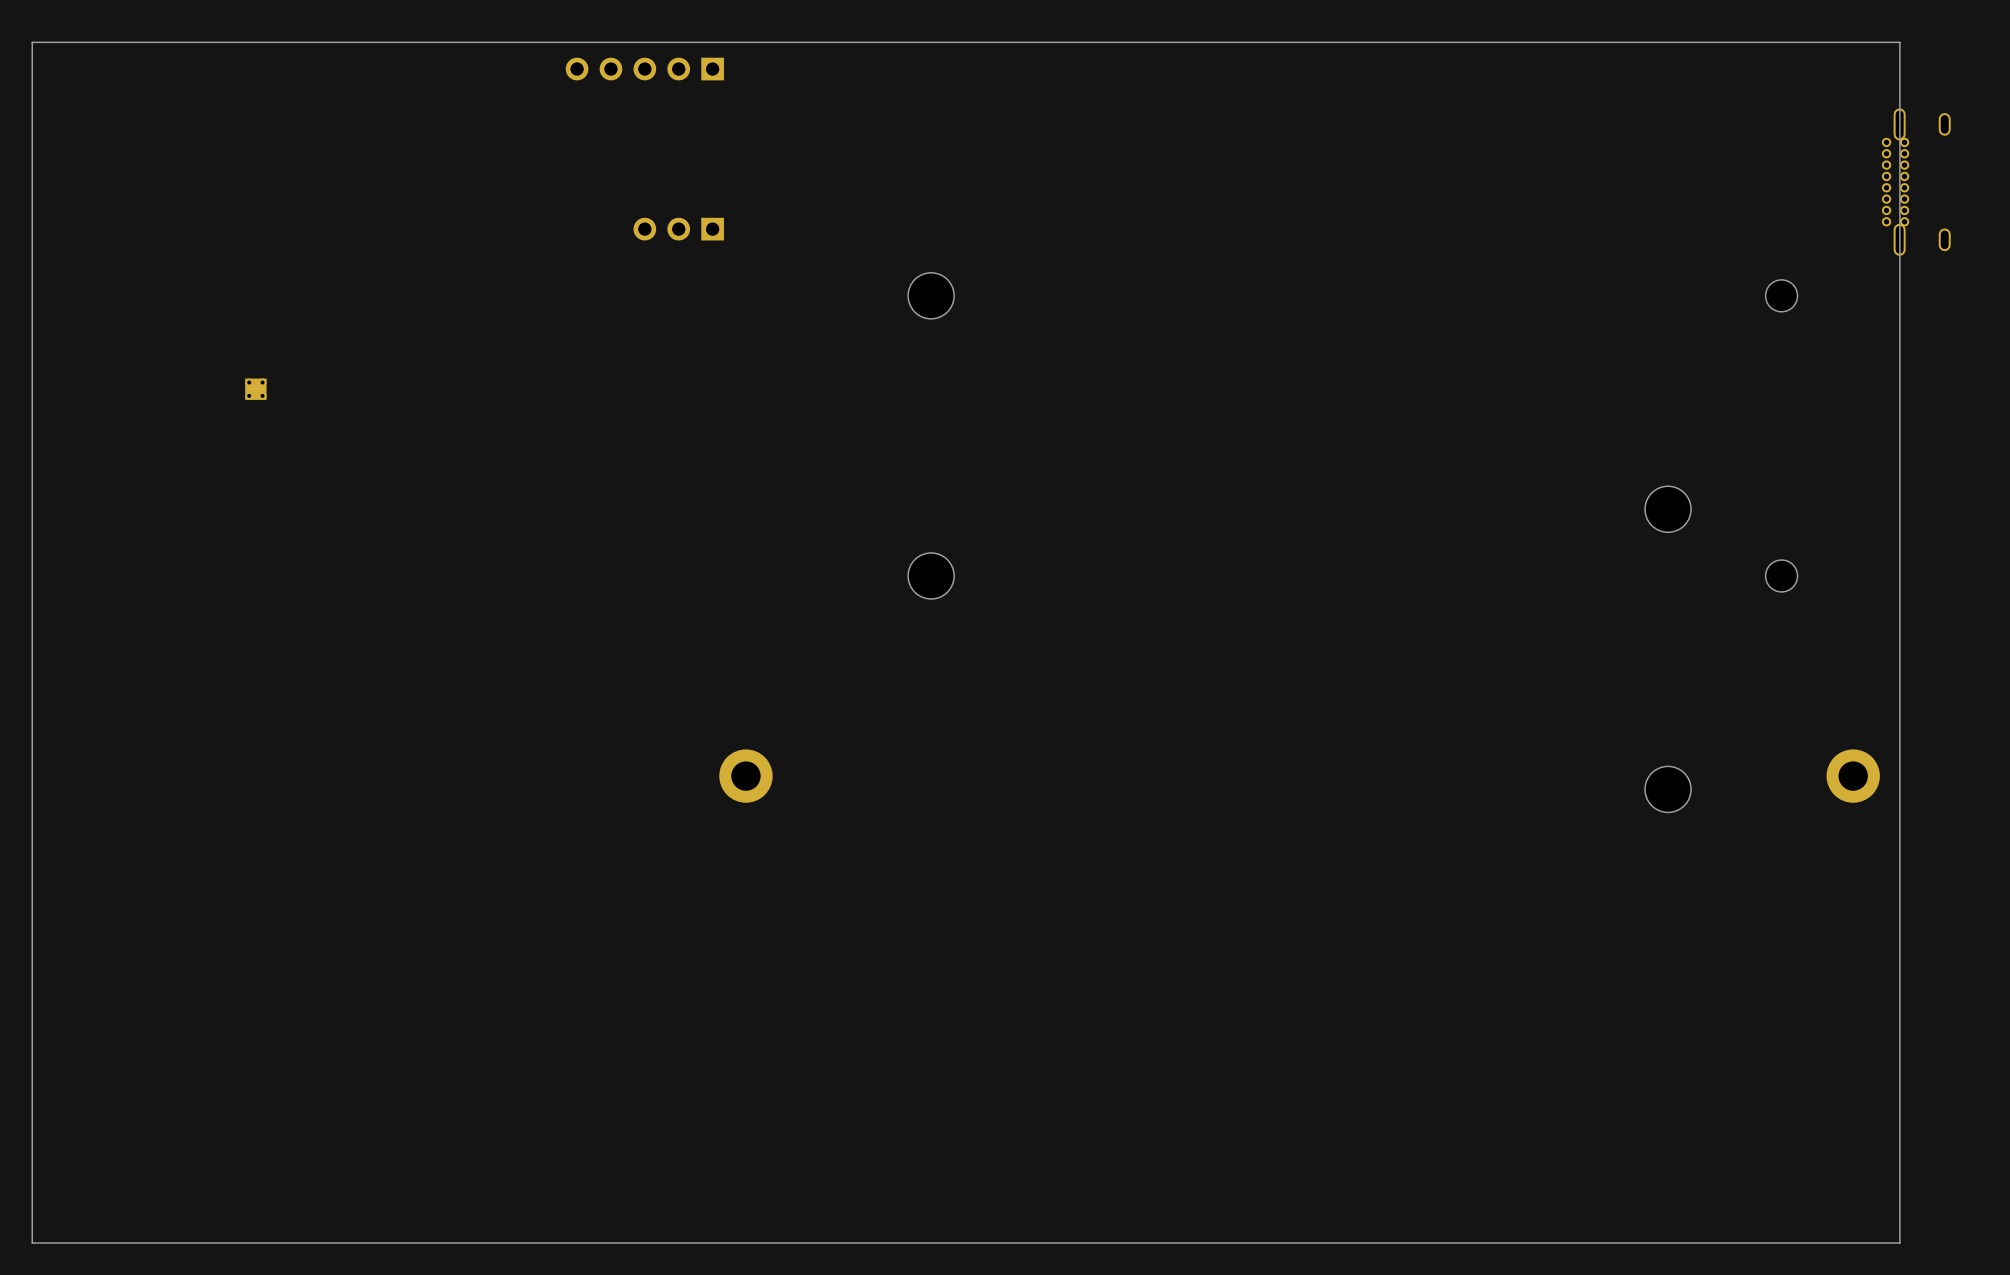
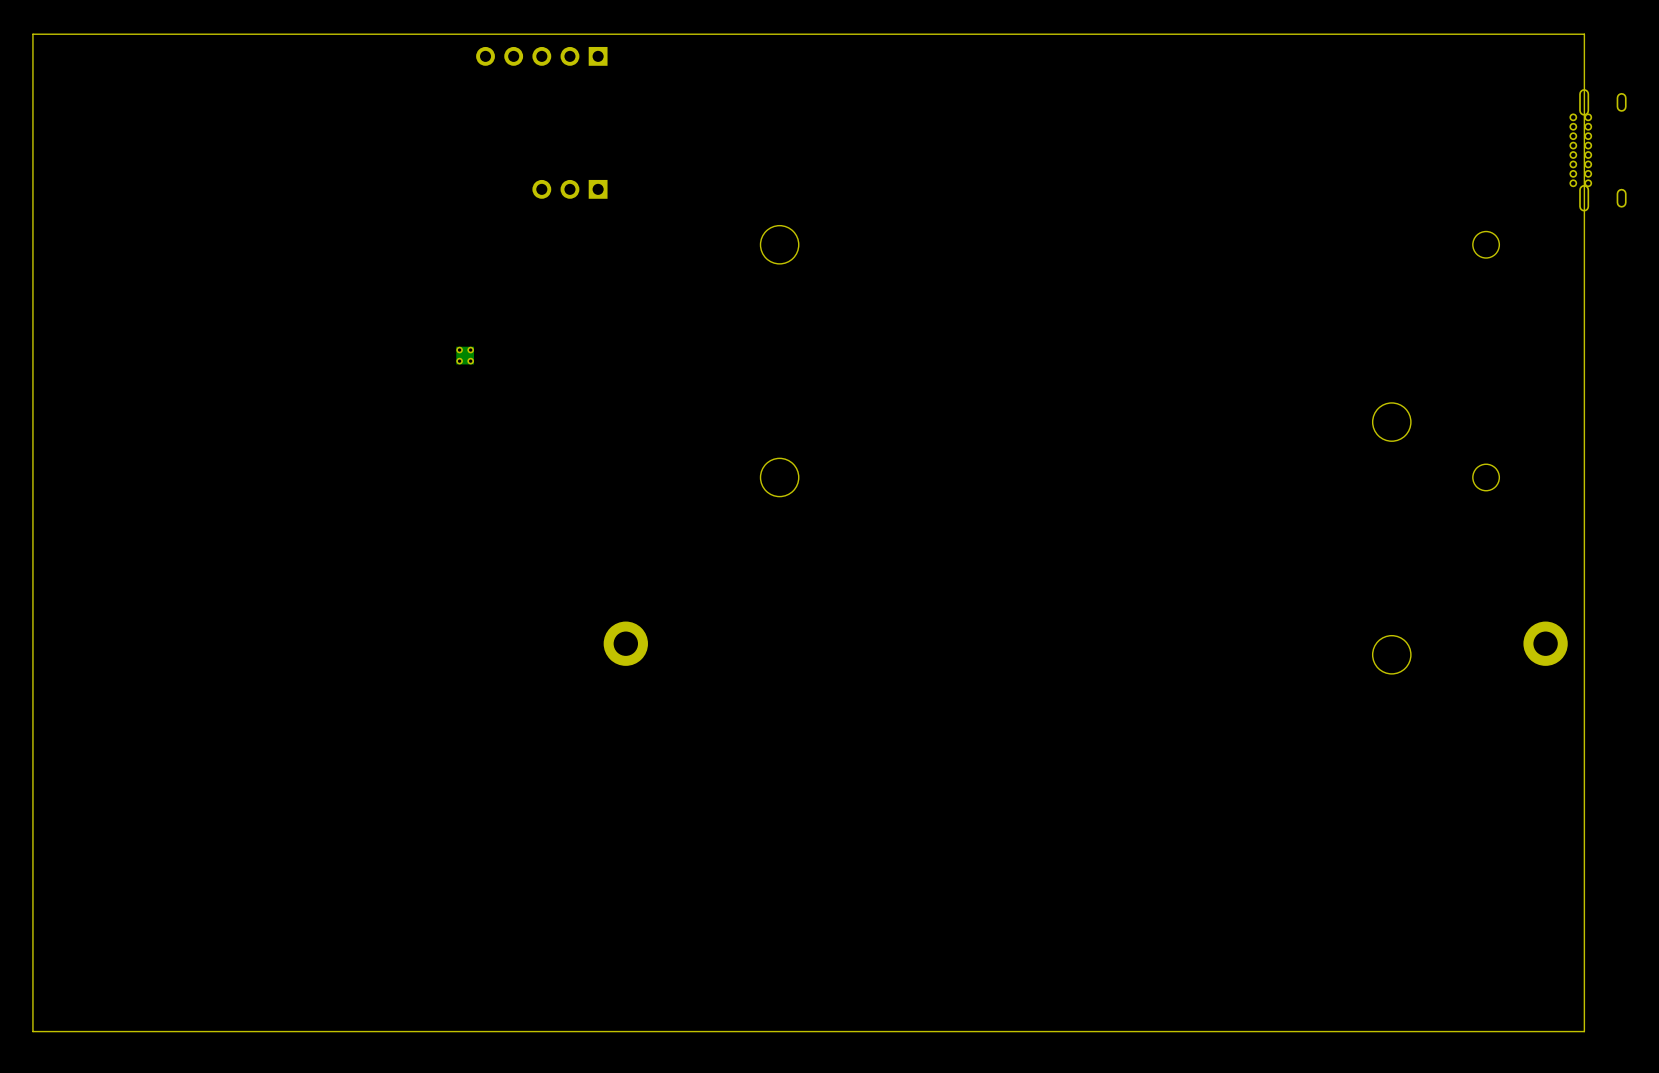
part position: (255, 389) -> (465, 355)

